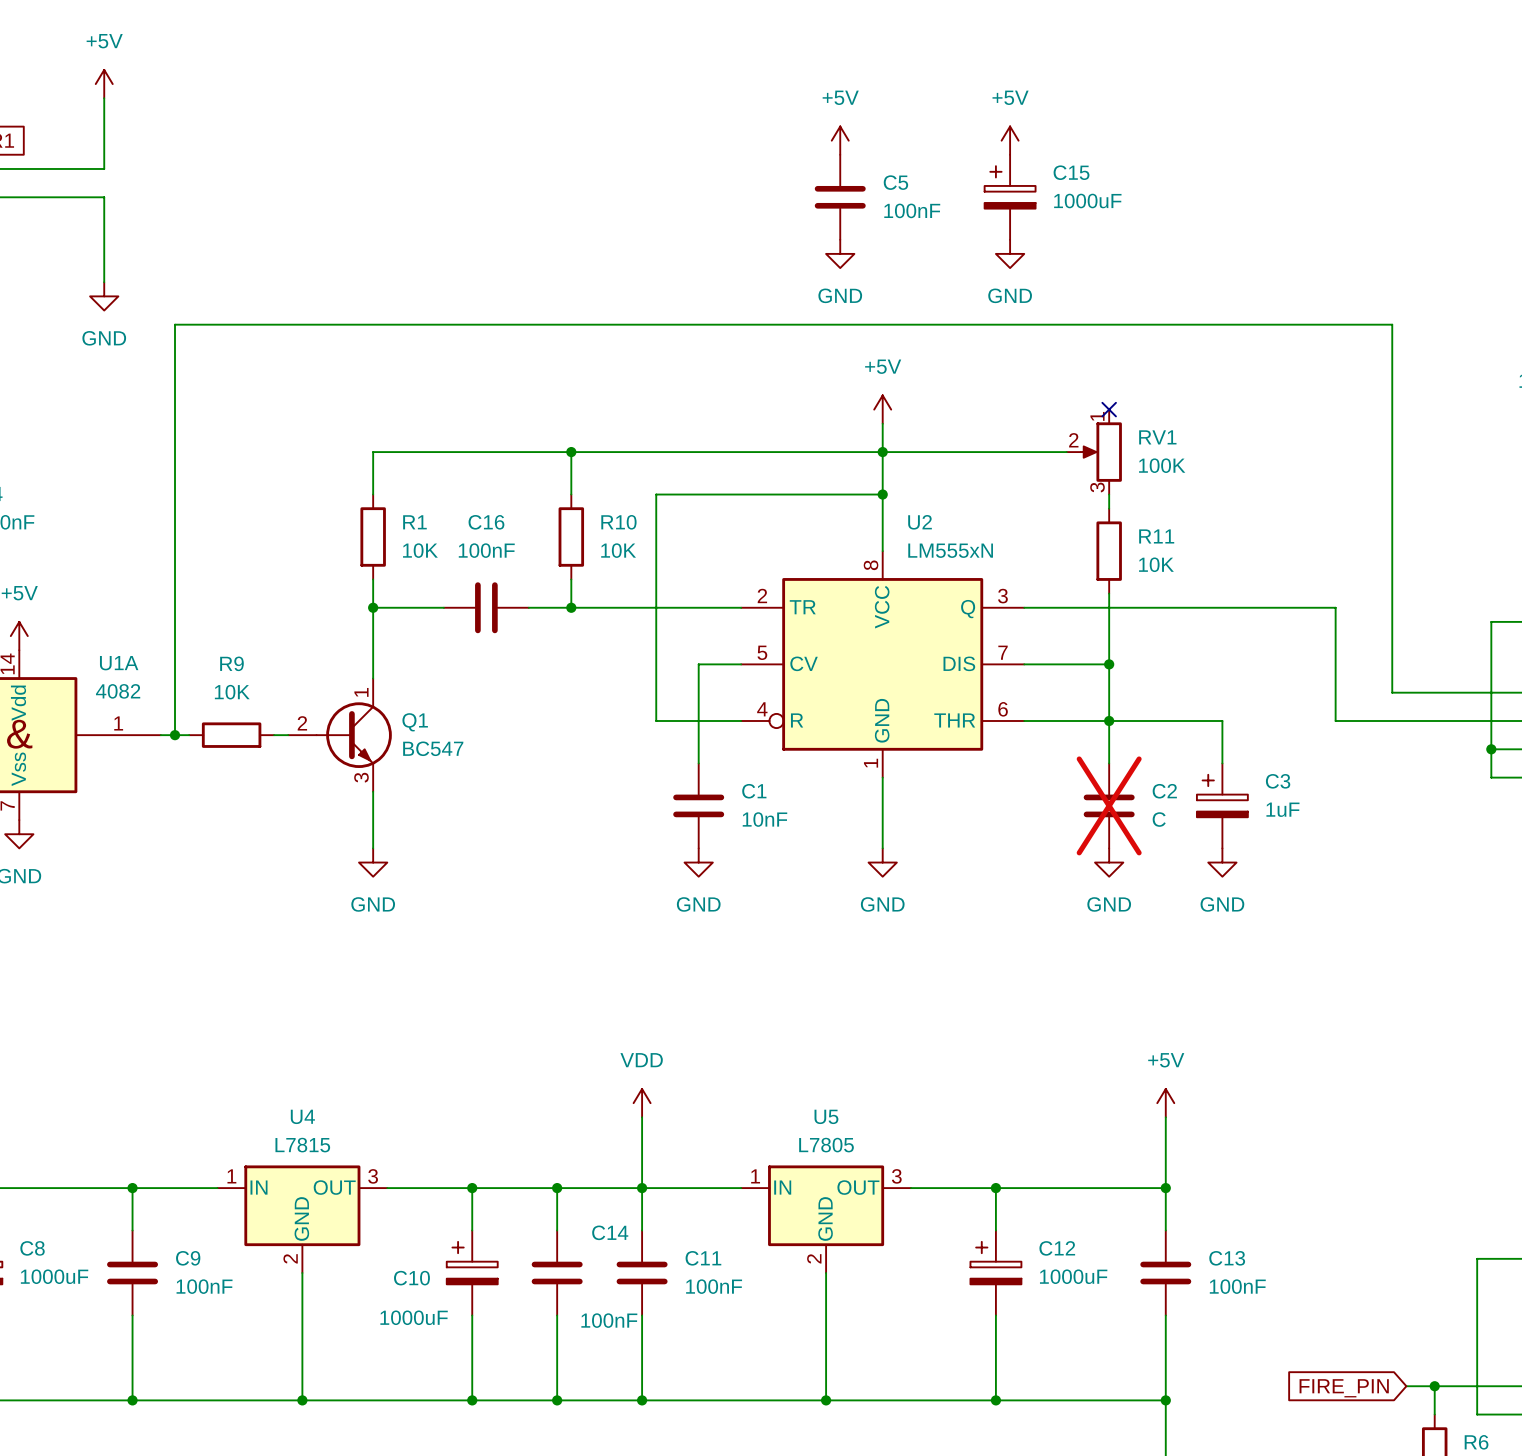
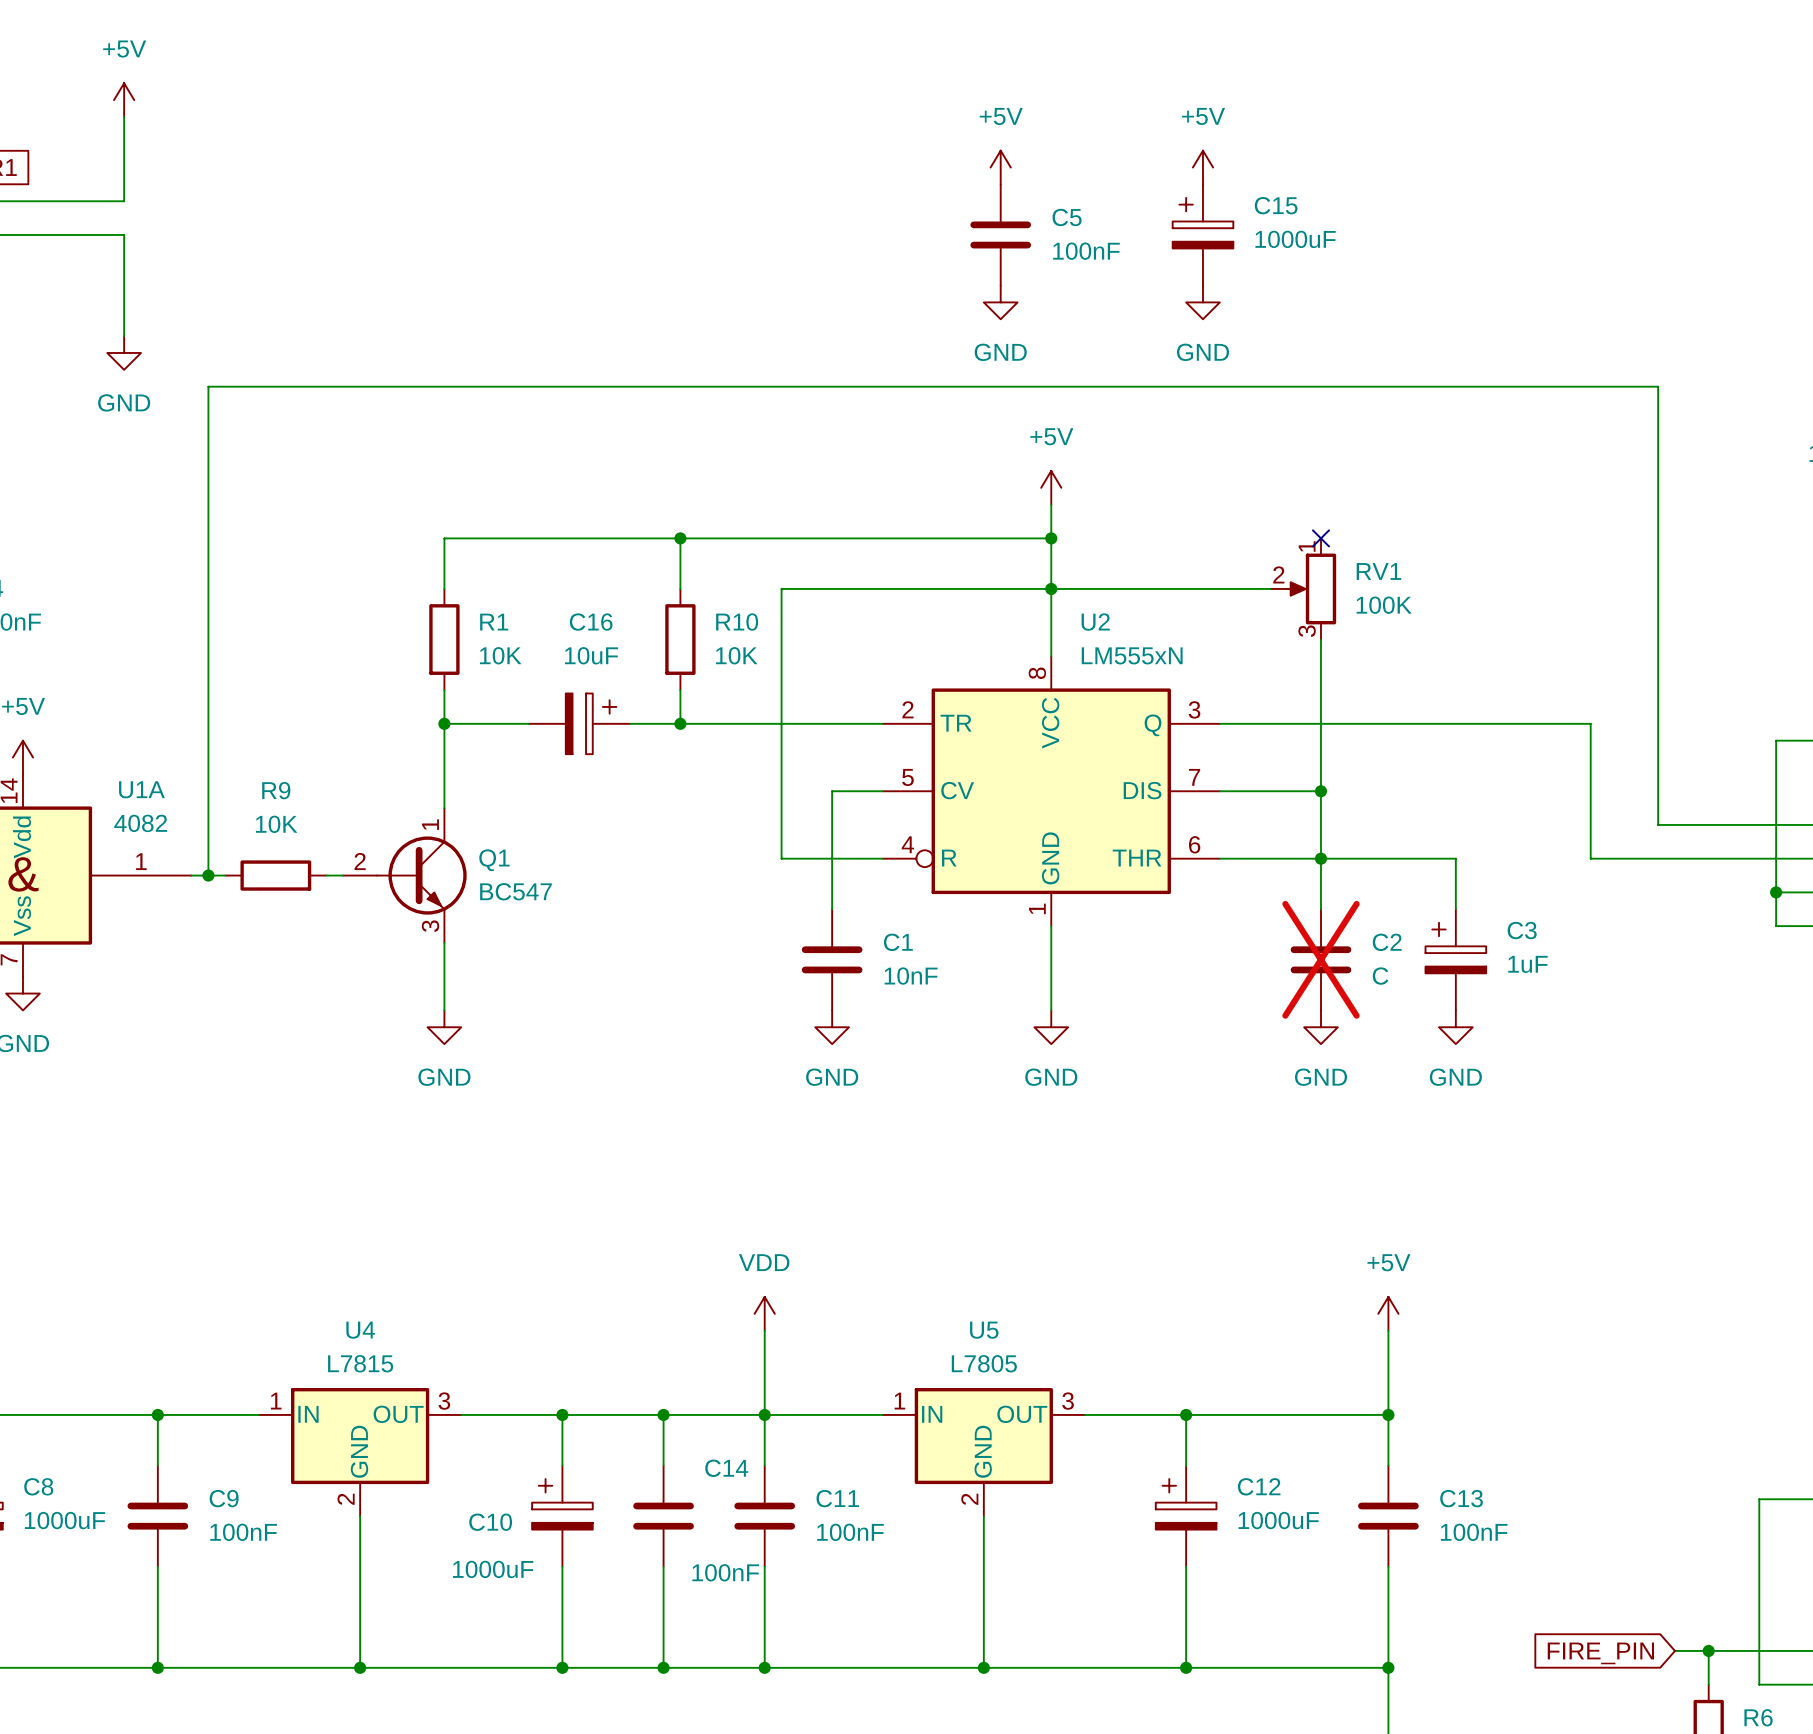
no-connect mark position: (1109, 409) -> (1320, 538)
wire: (882, 452) (1066, 452) -> (1051, 588) (1270, 588)
RV1 position: (1094, 452) -> (1303, 588)
wire: (1109, 494) (1109, 508) -> none
wire: none -> (1320, 639) (1320, 706)
C16 value: 100nF (486, 550) -> 10uF (591, 655)
R11: 10K (1109, 551) -> none
C16 symbol: [443, 582, 529, 634] -> [528, 693, 630, 755]

